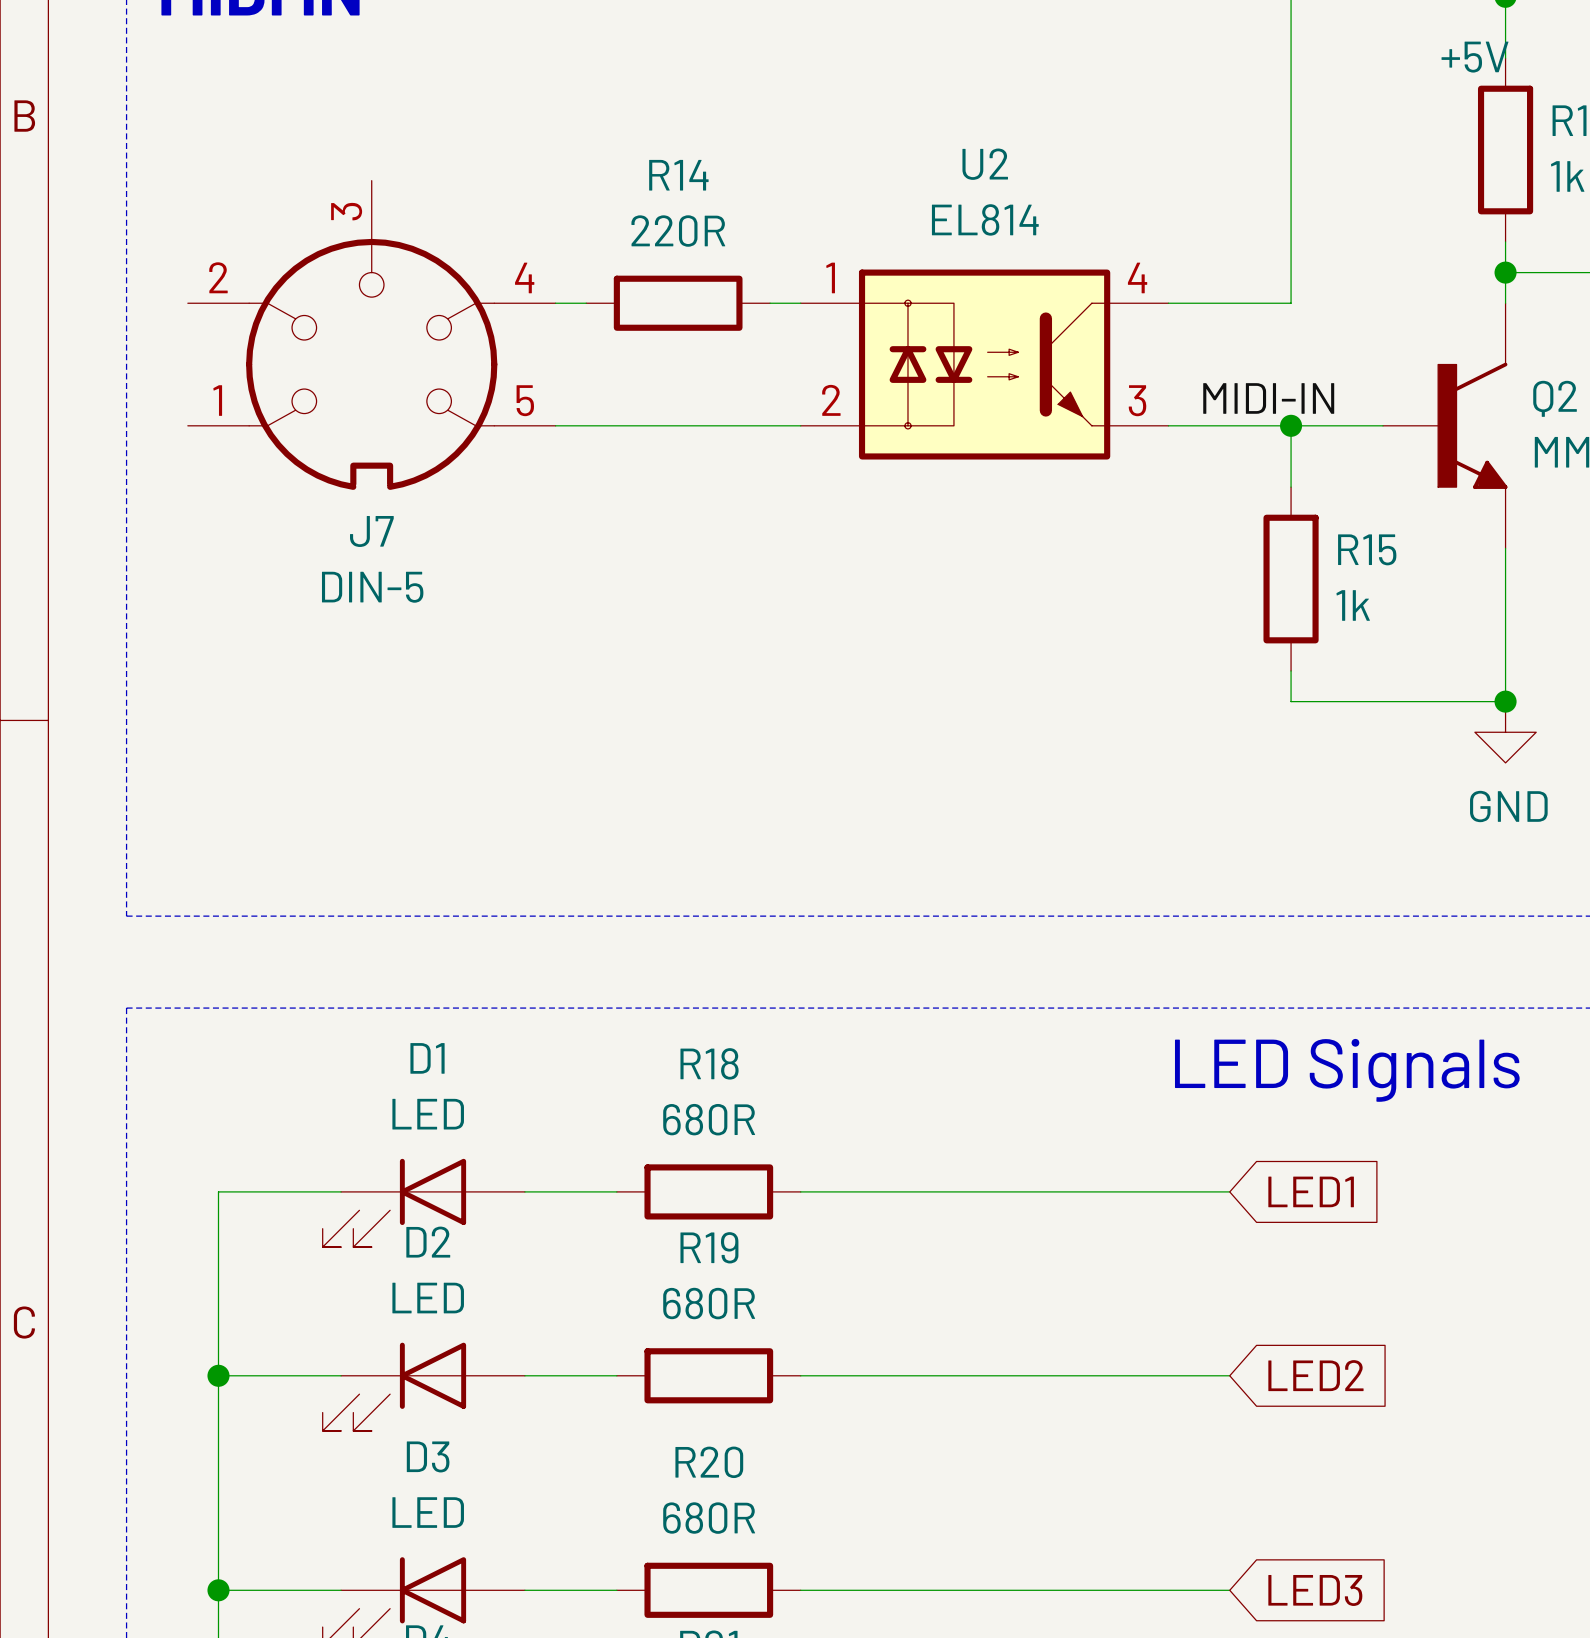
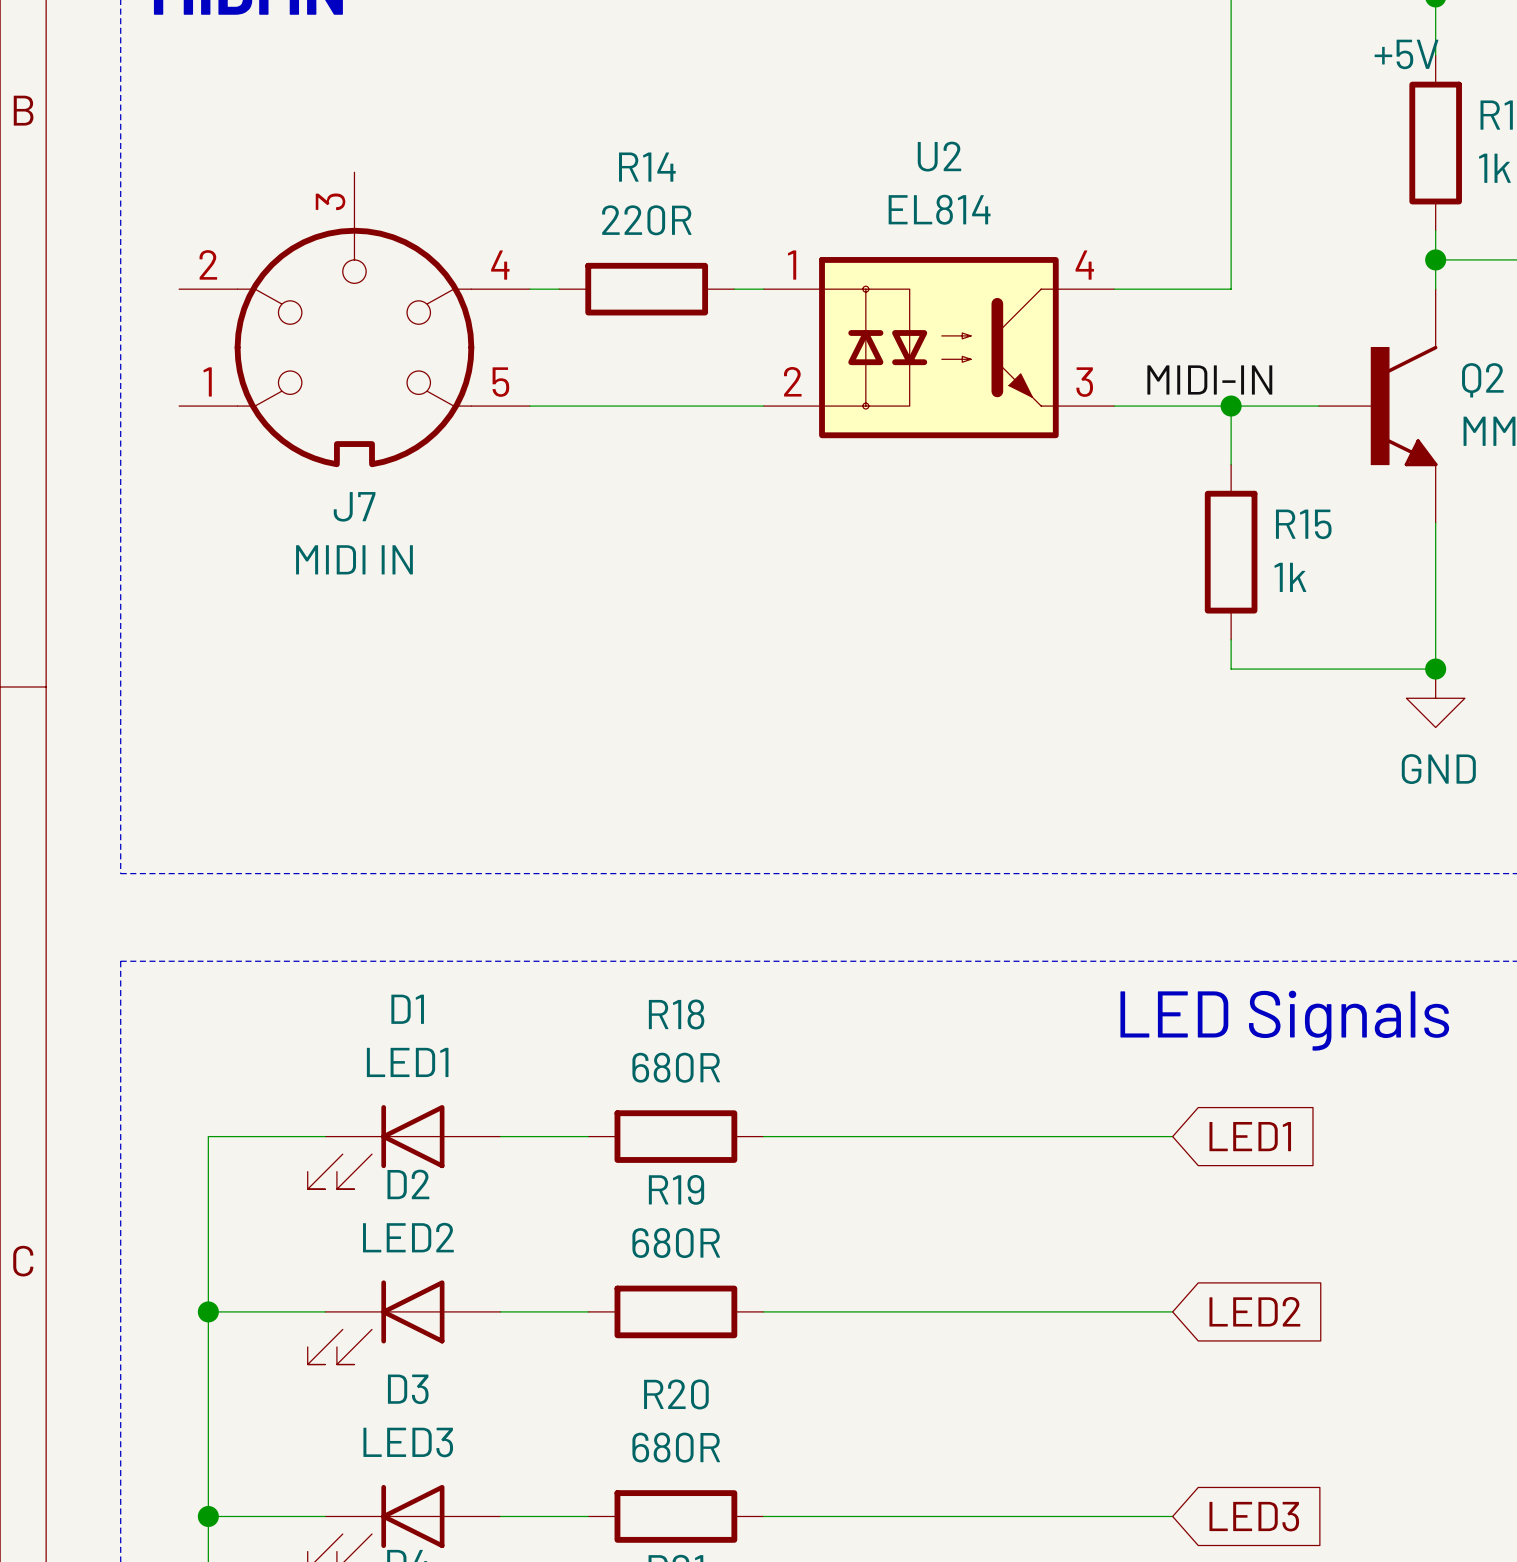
J7 value: DIN-5 (372, 587) -> MIDI IN (354, 559)
D1 value: LED (428, 1114) -> LED1 (407, 1062)
D2 value: LED (428, 1298) -> LED2 (408, 1237)
D3 value: LED (428, 1512) -> LED3 (408, 1442)

